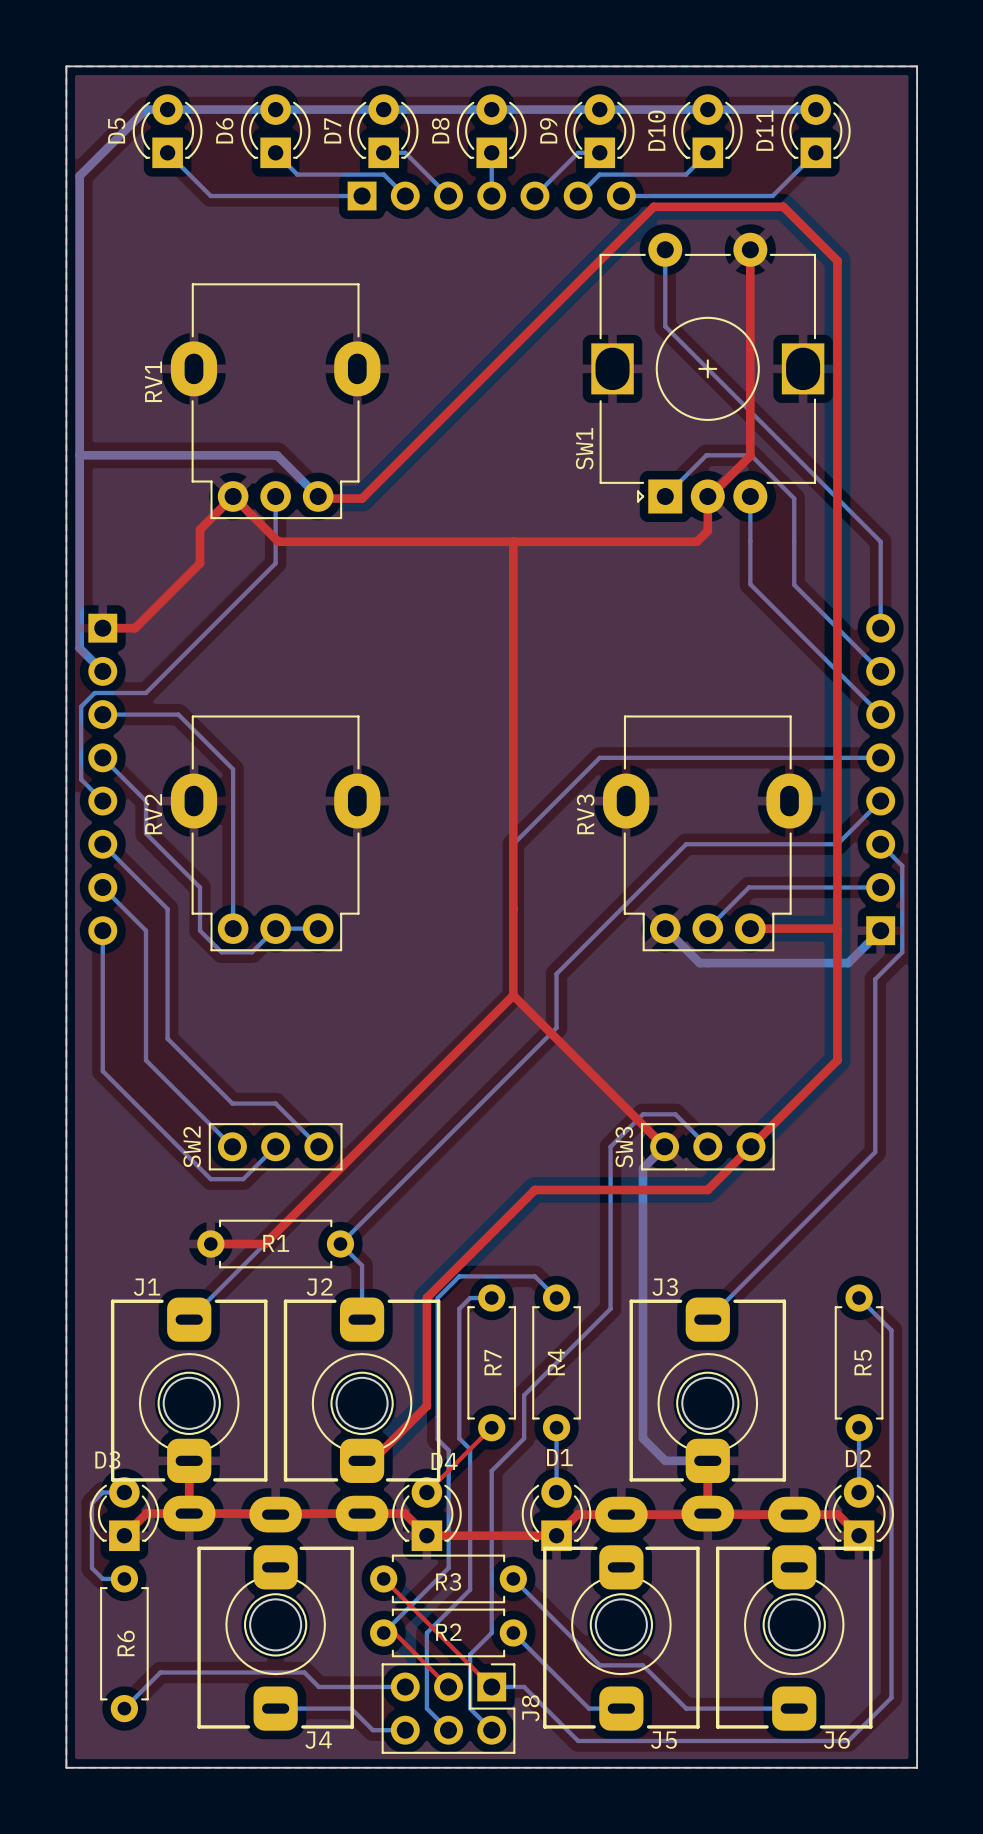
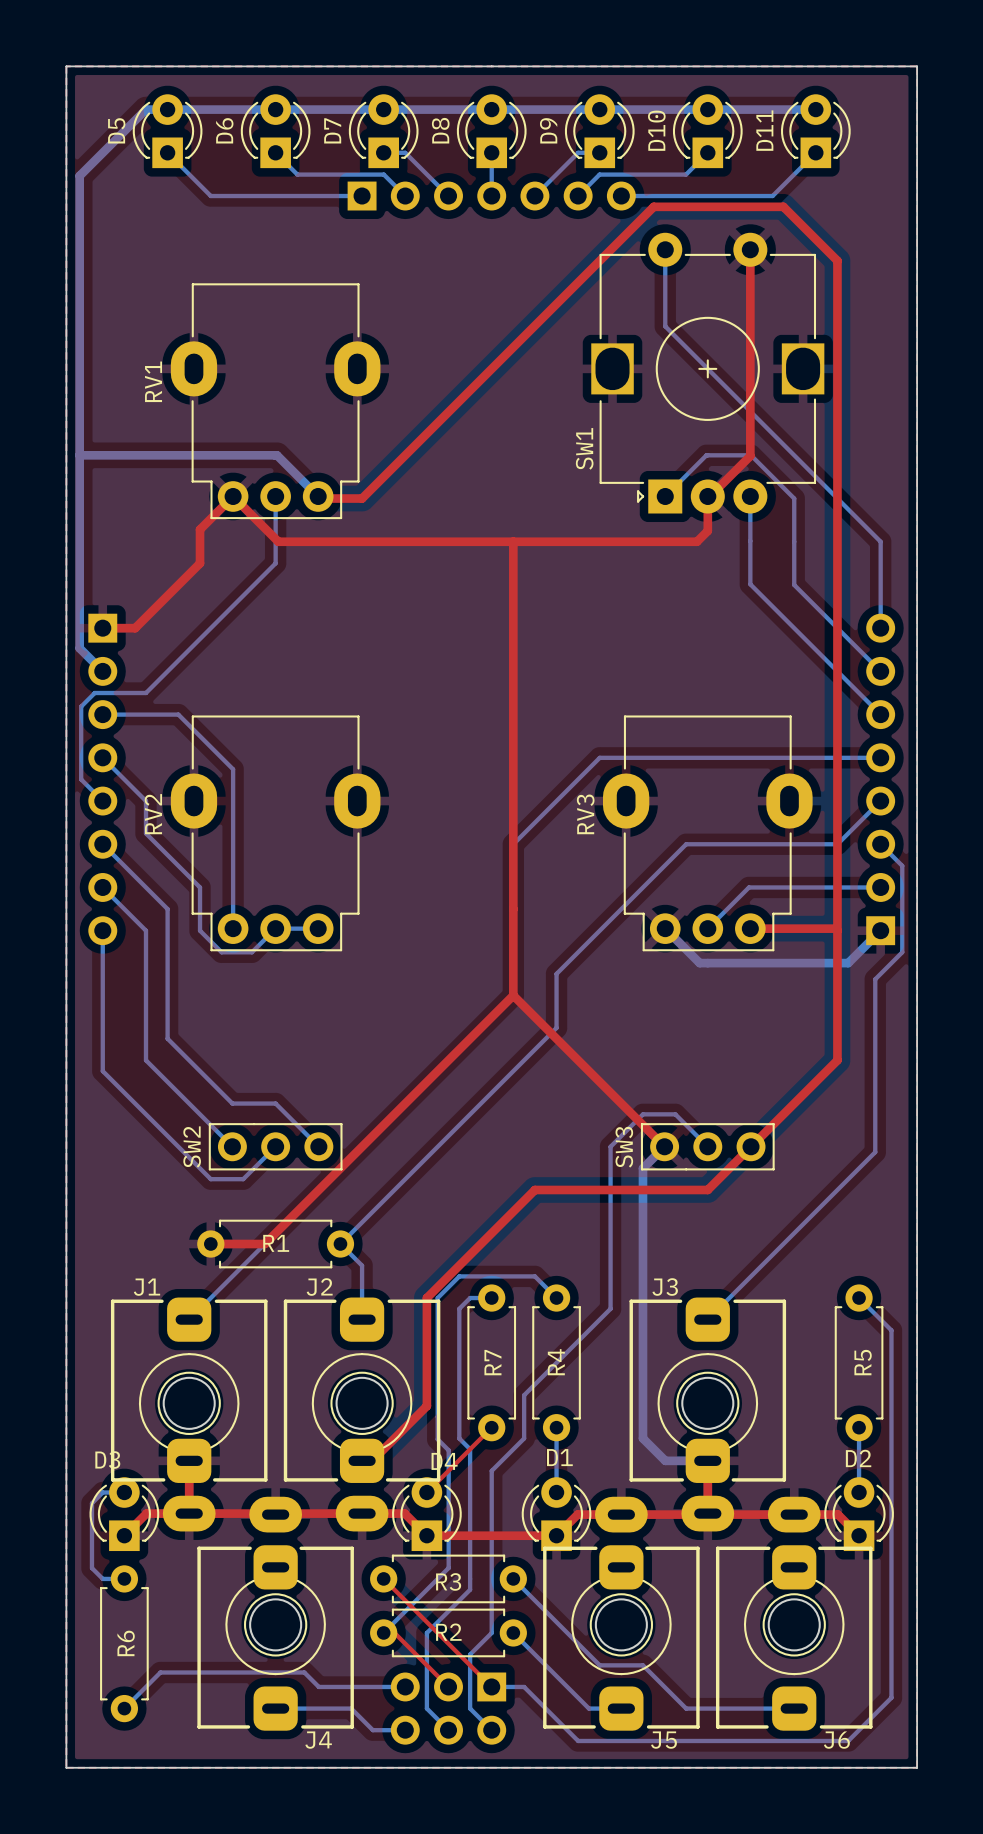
J8: (448, 1708) -> none

